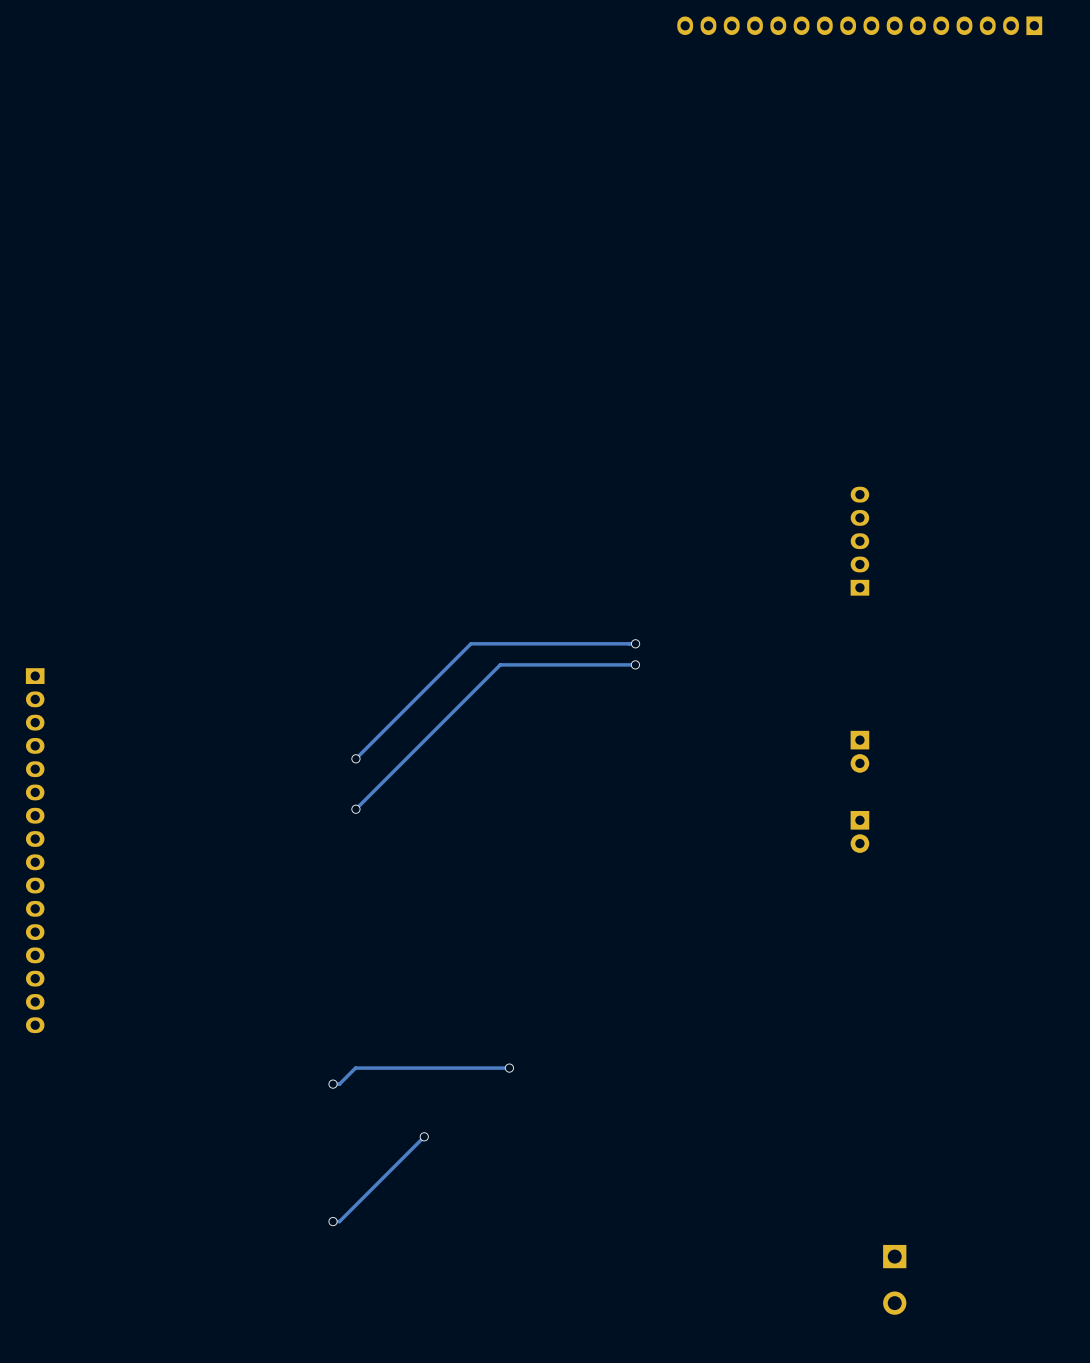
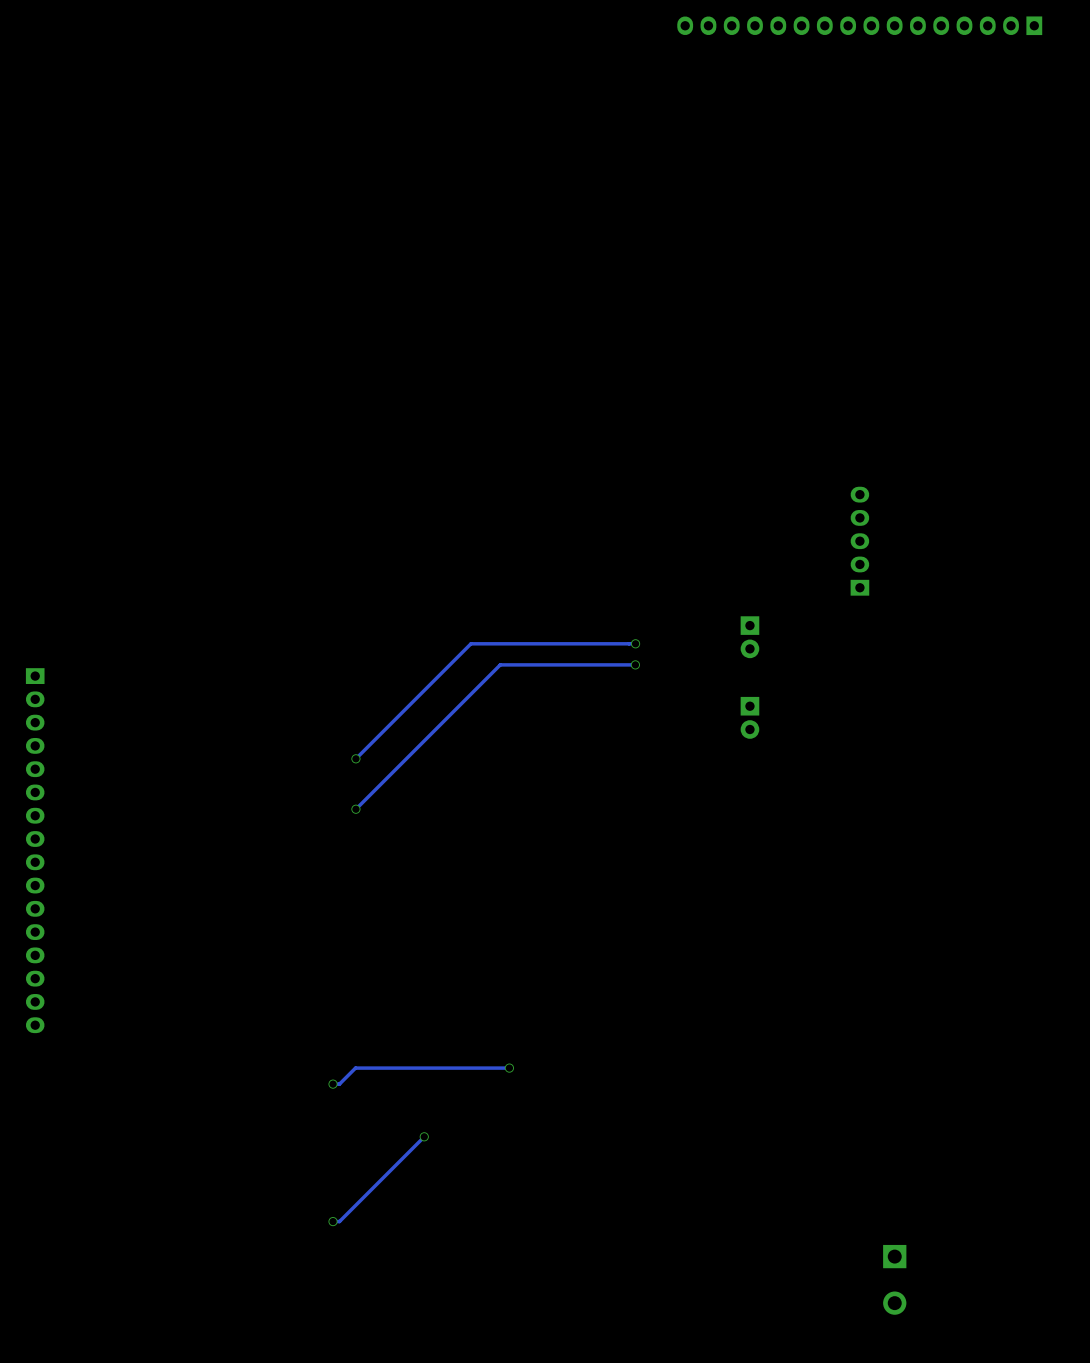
part: none -> (749, 637)
part: none -> (749, 717)
part: (859, 751) -> none
part: (859, 831) -> none

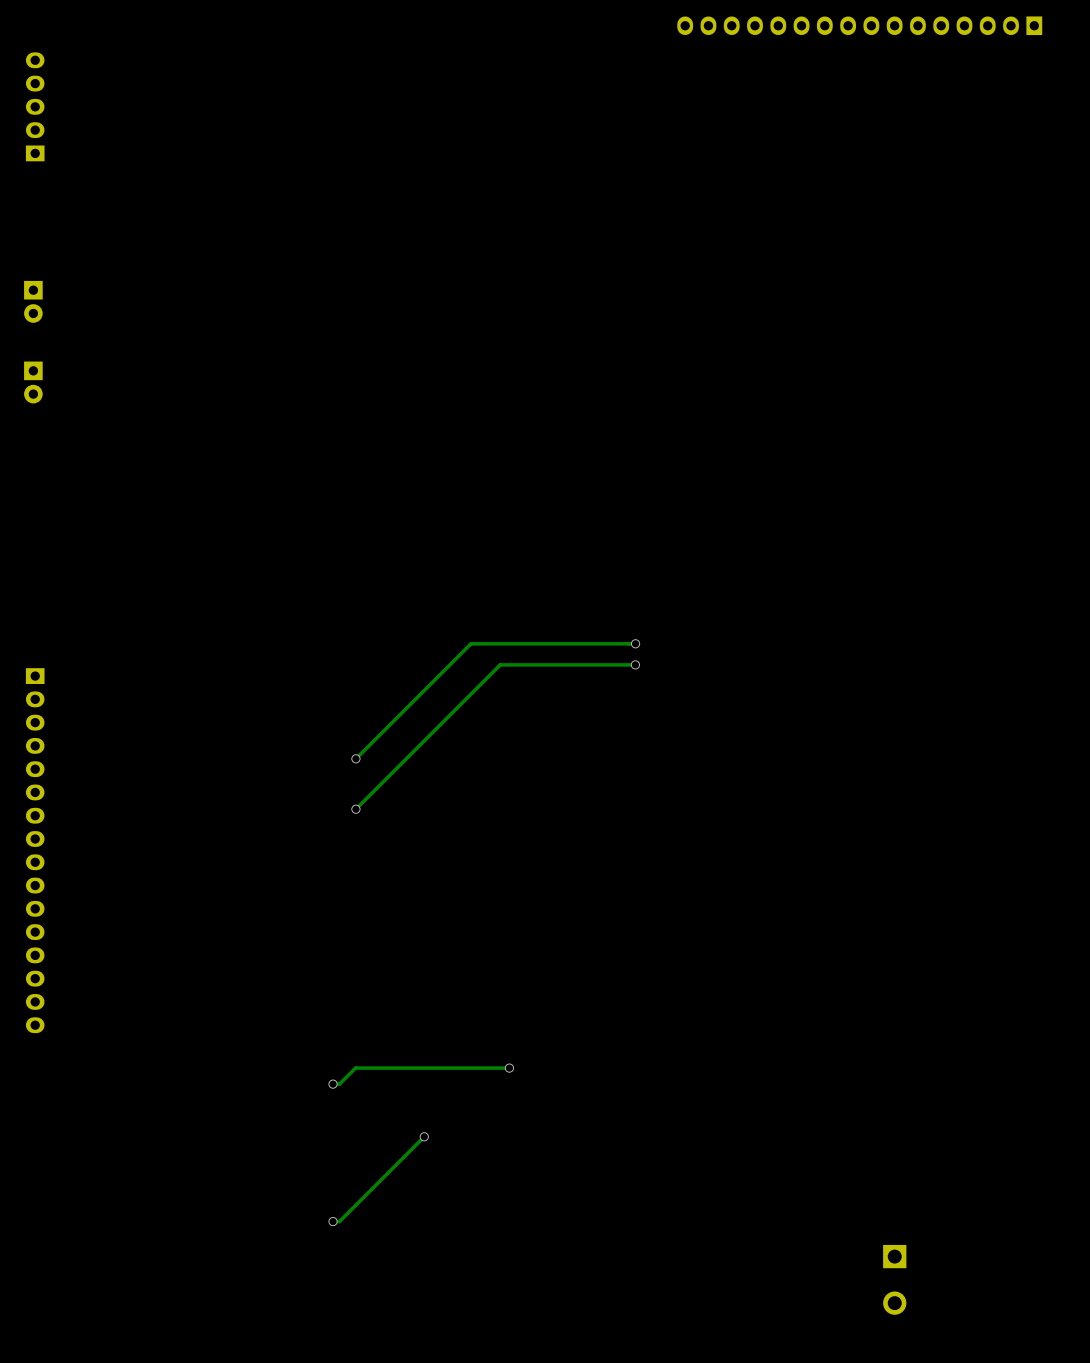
part: none -> (35, 106)
part: none -> (33, 301)
part: none -> (33, 382)
part: (859, 541) -> none
part: (749, 637) -> none
part: (749, 717) -> none

